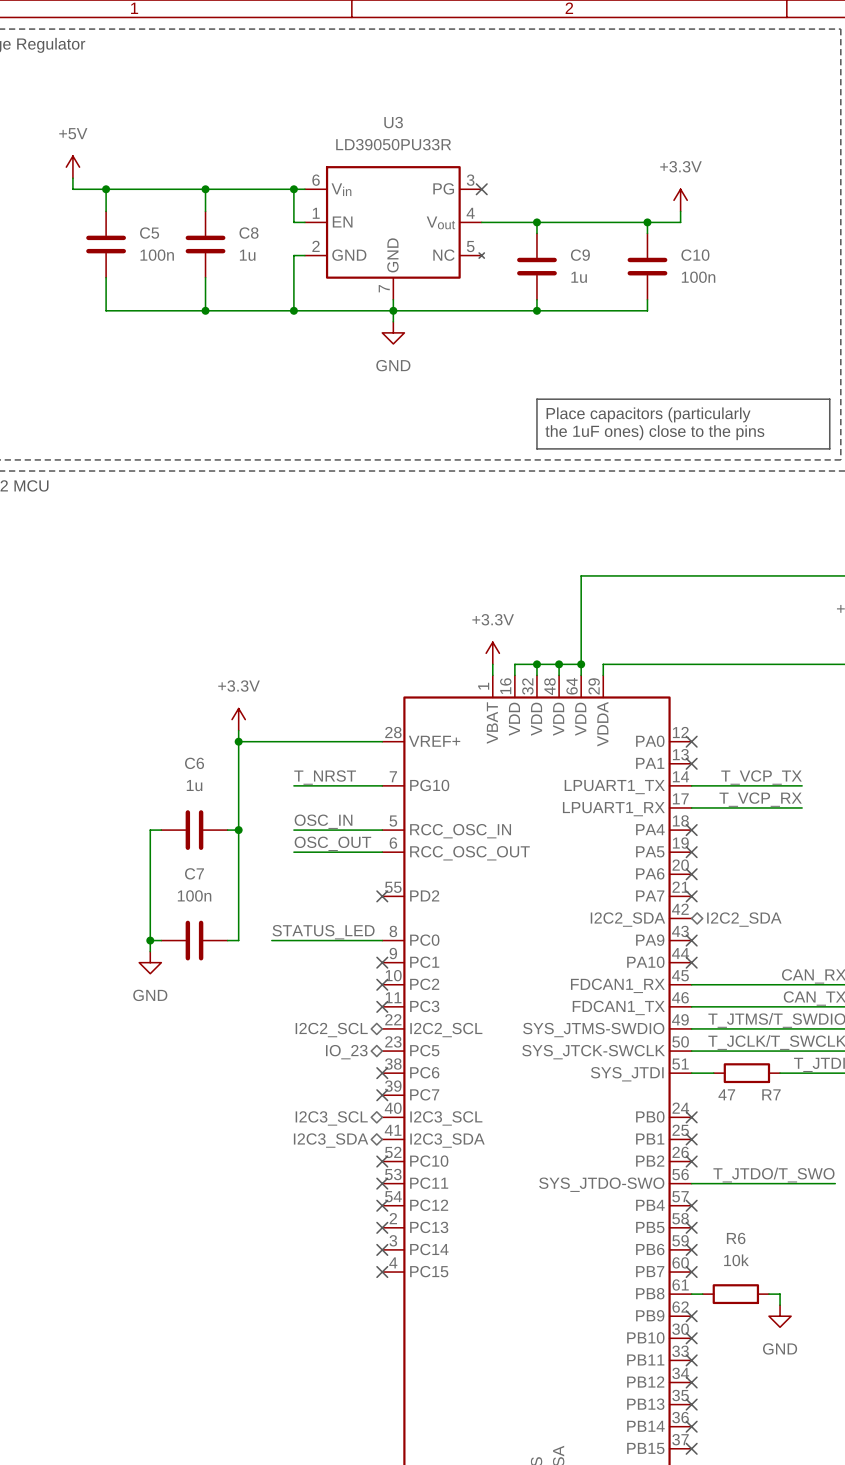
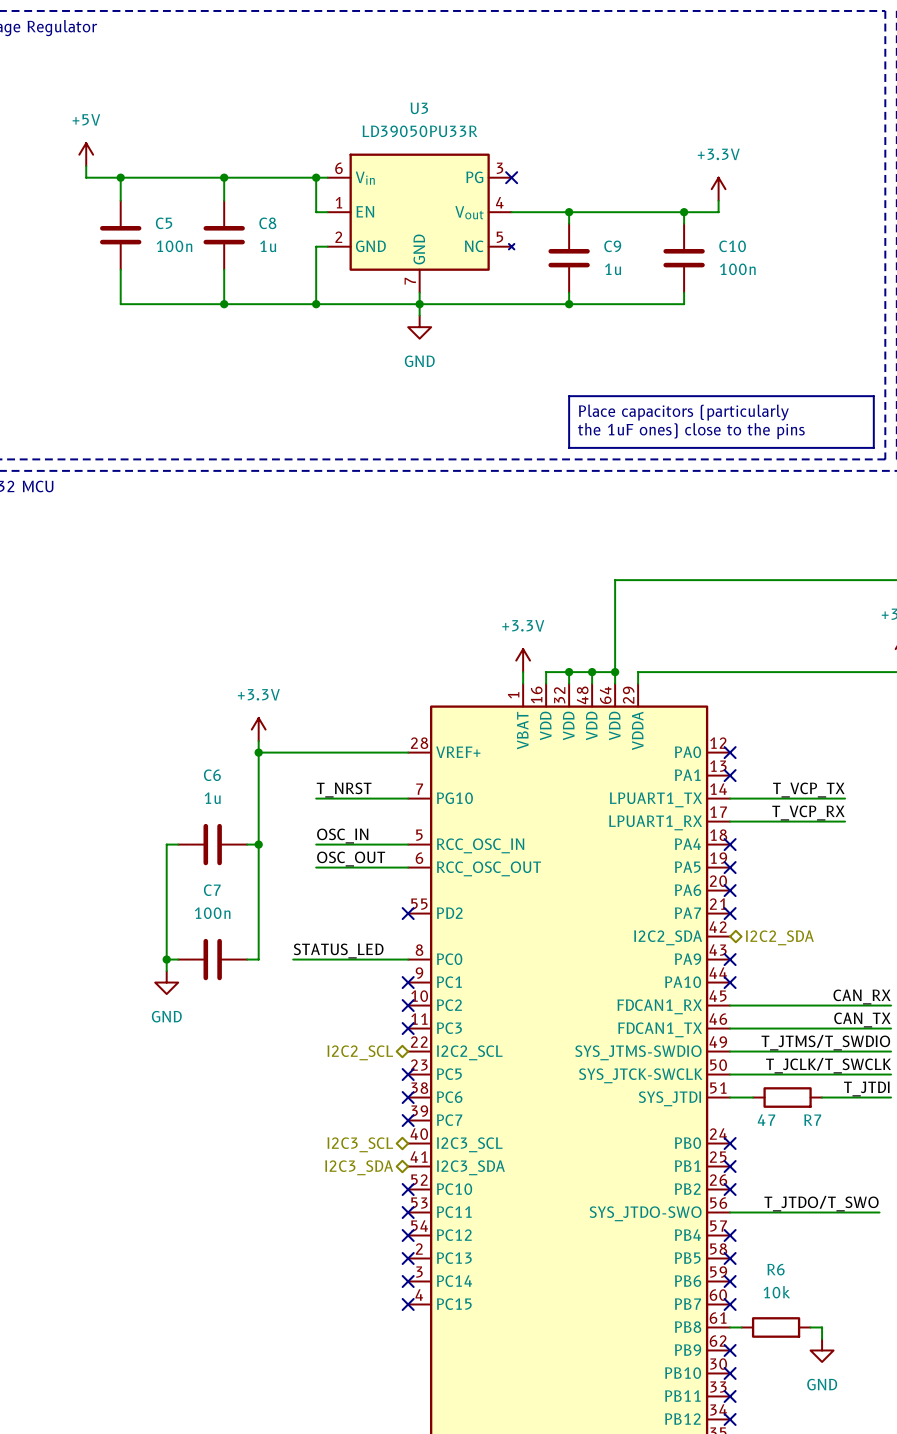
no-connect mark: none -> (408, 1074)
hierarchical label: IO_23 (346, 1052) -> none

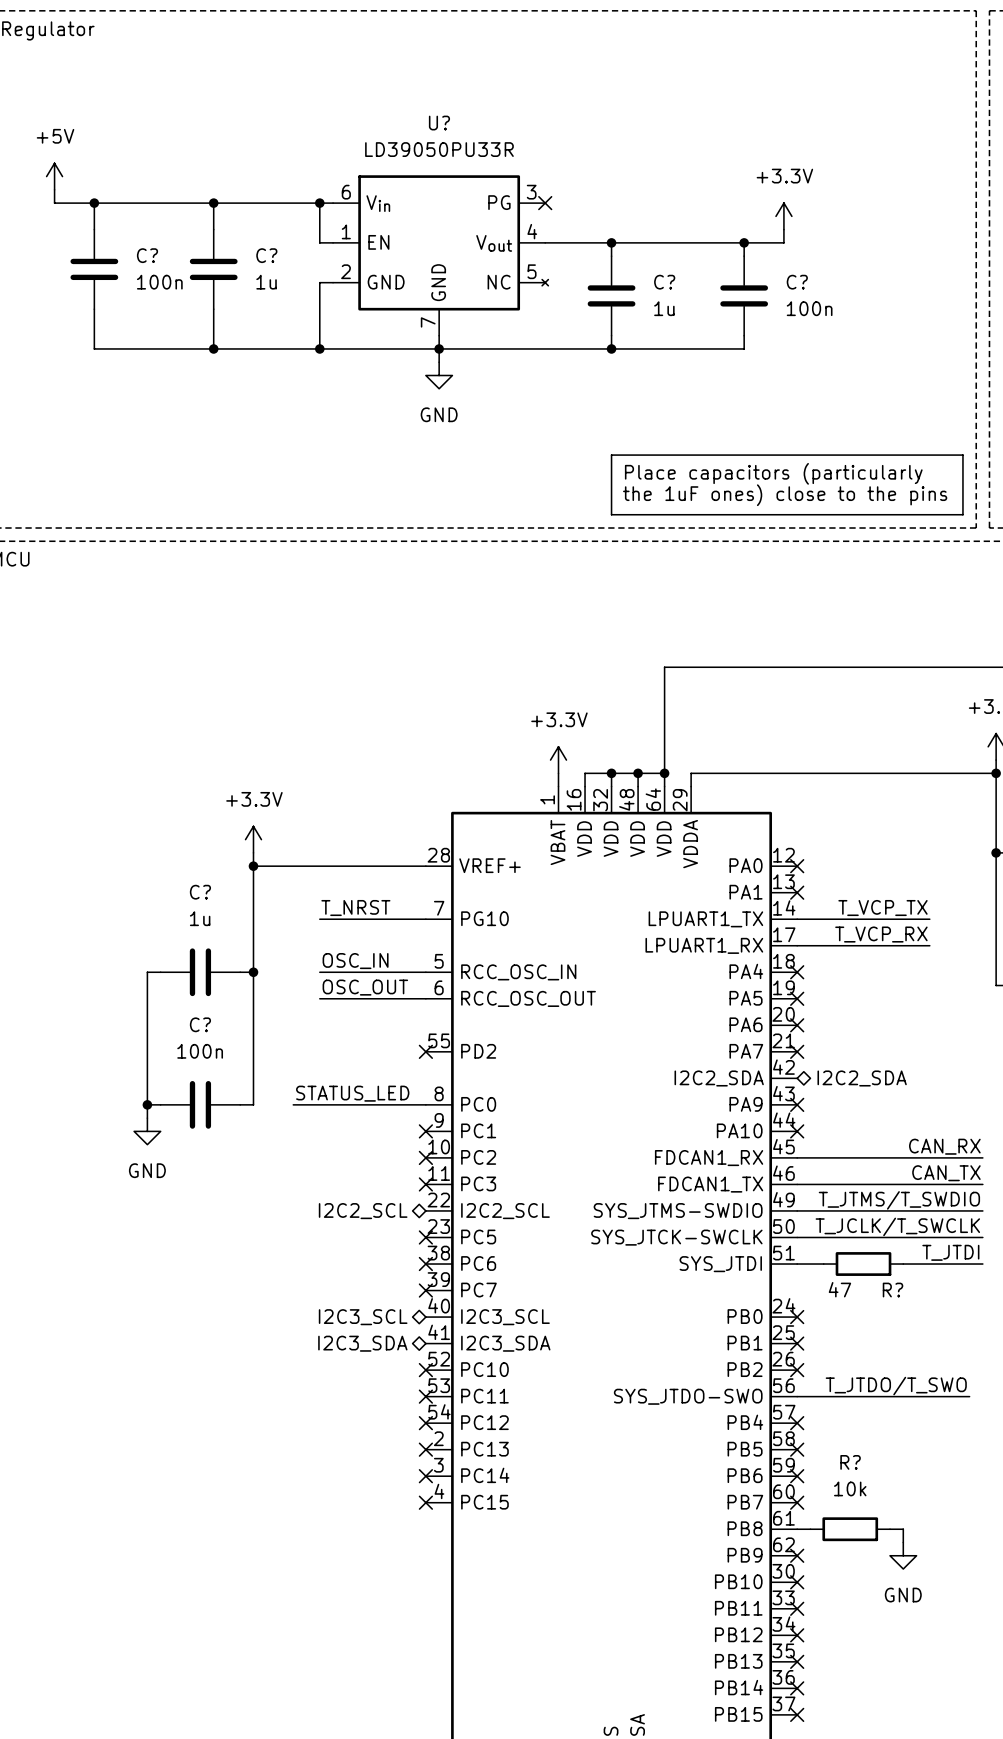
U3 name: U3 (419, 108) -> U? (439, 123)
C5 name: C5 (164, 223) -> C? (147, 255)
C8 name: C8 (267, 223) -> C? (266, 255)
C9 name: C9 (612, 246) -> C? (664, 282)
C10 name: C10 (732, 246) -> C? (797, 282)
C6 name: C6 (212, 775) -> C? (200, 892)
C7 name: C7 (212, 890) -> C? (200, 1024)
R7 name: R7 (812, 1120) -> R? (893, 1290)
R6 name: R6 (776, 1269) -> R? (850, 1462)

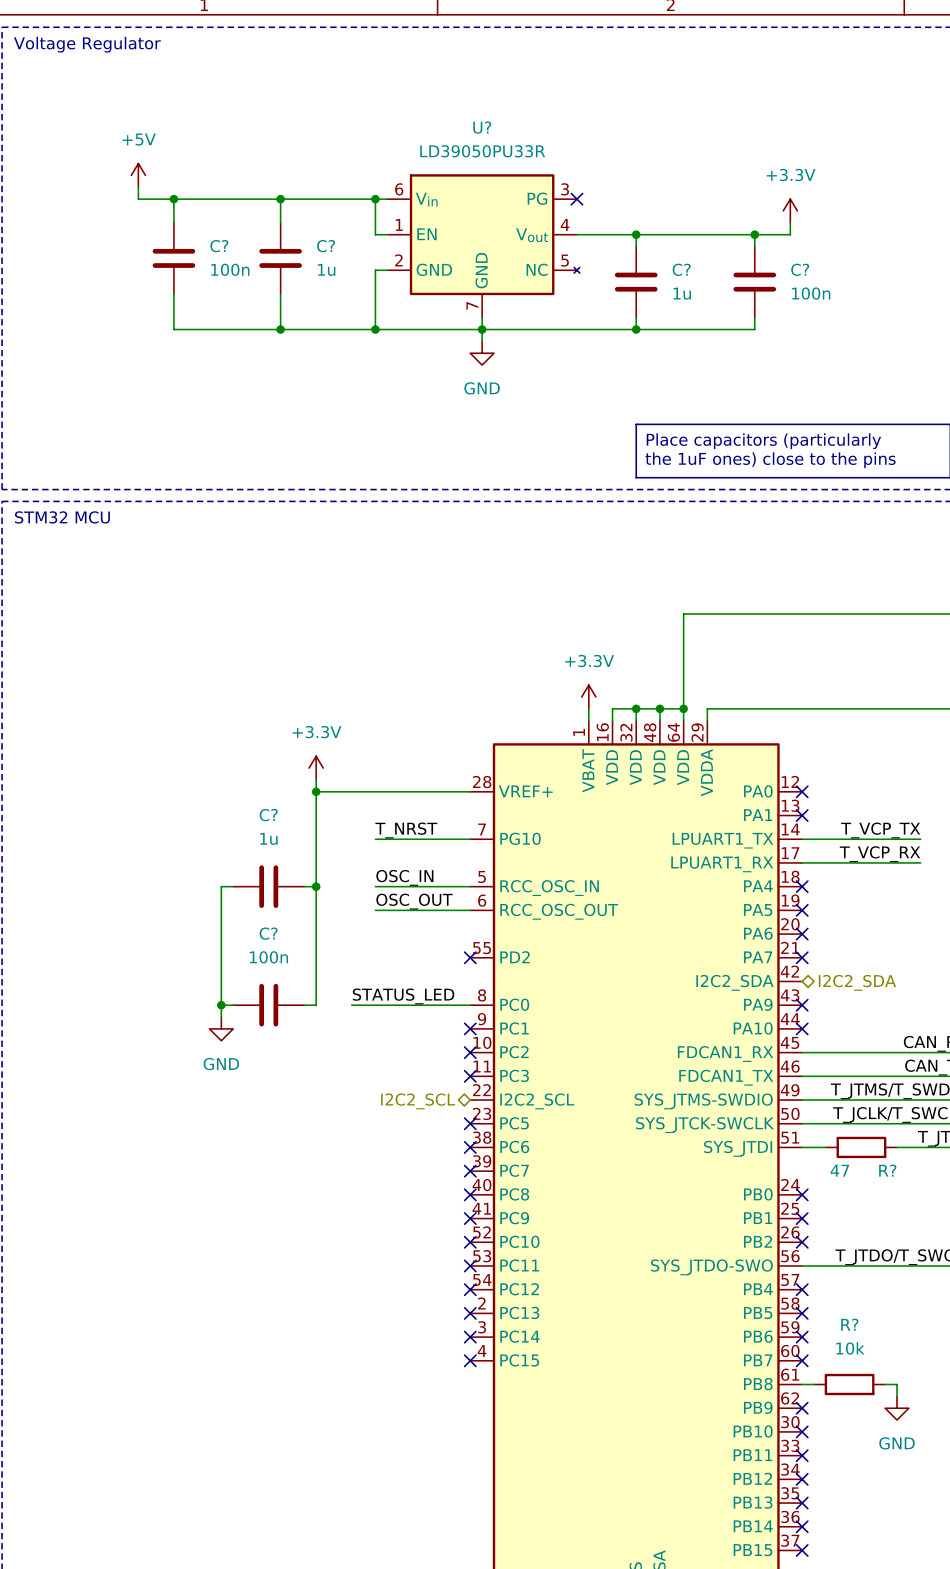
hierarchical label: I2C3_SCL (363, 1317) -> none
no-connect mark: none -> (470, 1194)
part pin name: I2C3_SCL (505, 1317) -> PC8 (514, 1194)
hierarchical label: I2C3_SDA (362, 1343) -> none
no-connect mark: none -> (470, 1218)
part pin name: I2C3_SDA (505, 1343) -> PC9 (514, 1218)

